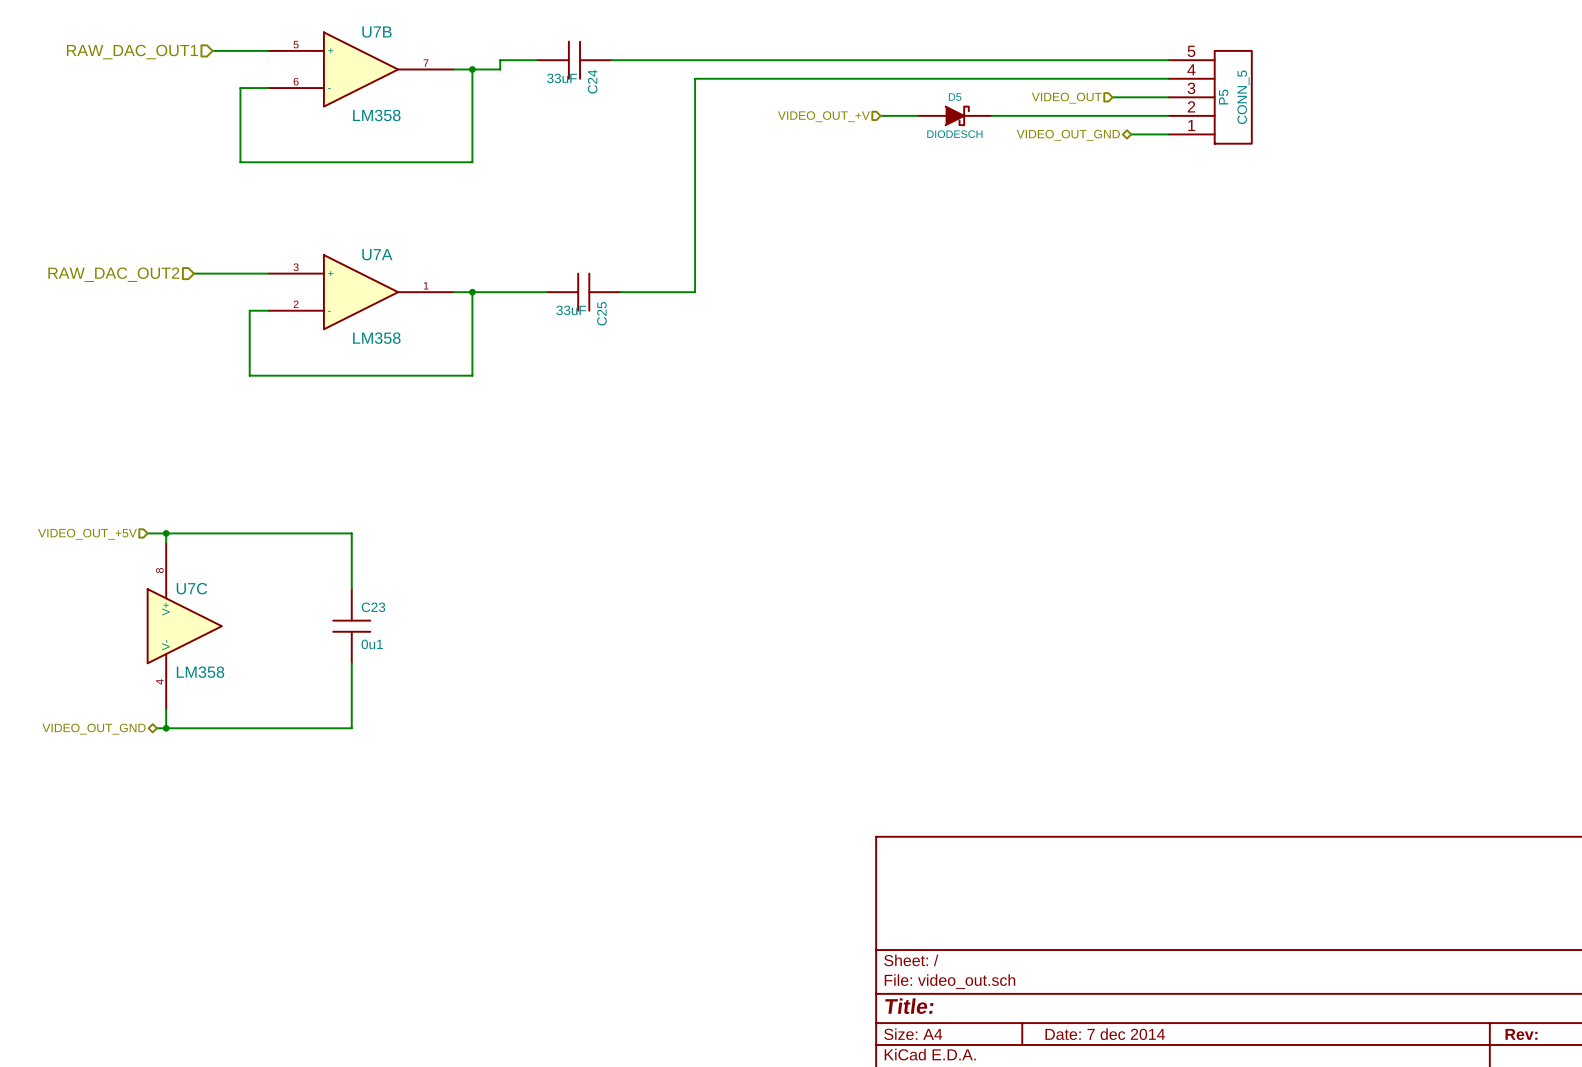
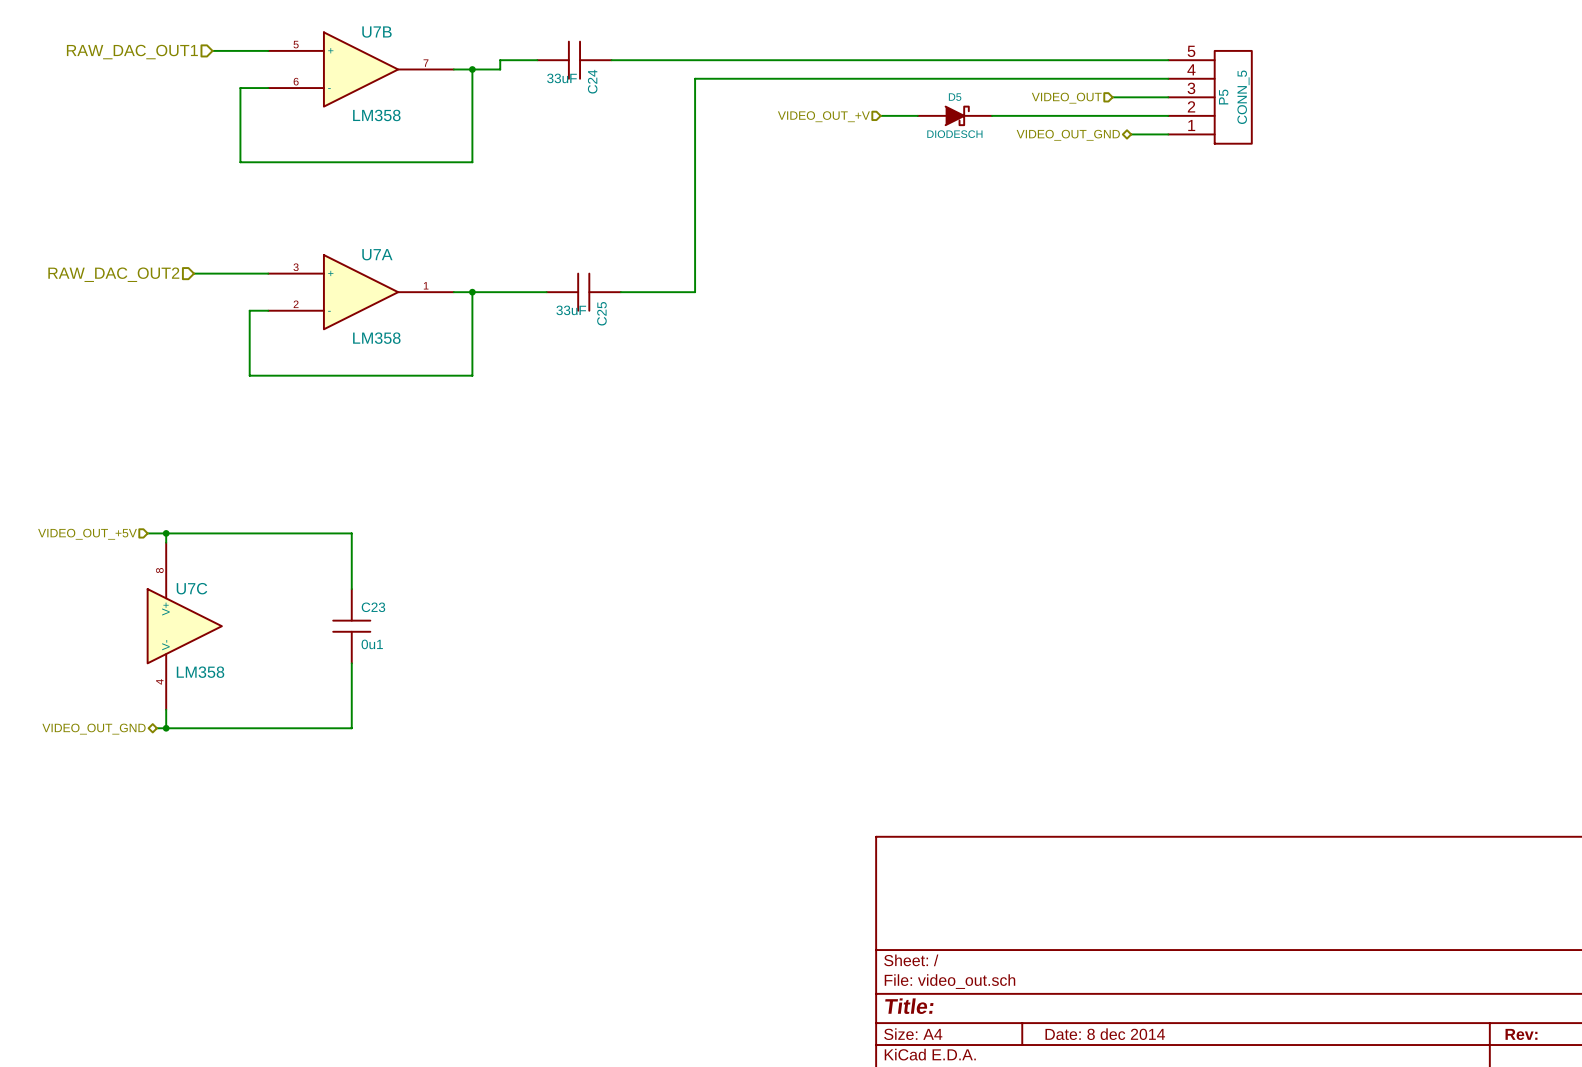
title block: Date: 7 dec 2014 (1105, 1034) -> Date: 8 dec 2014 (1105, 1034)

